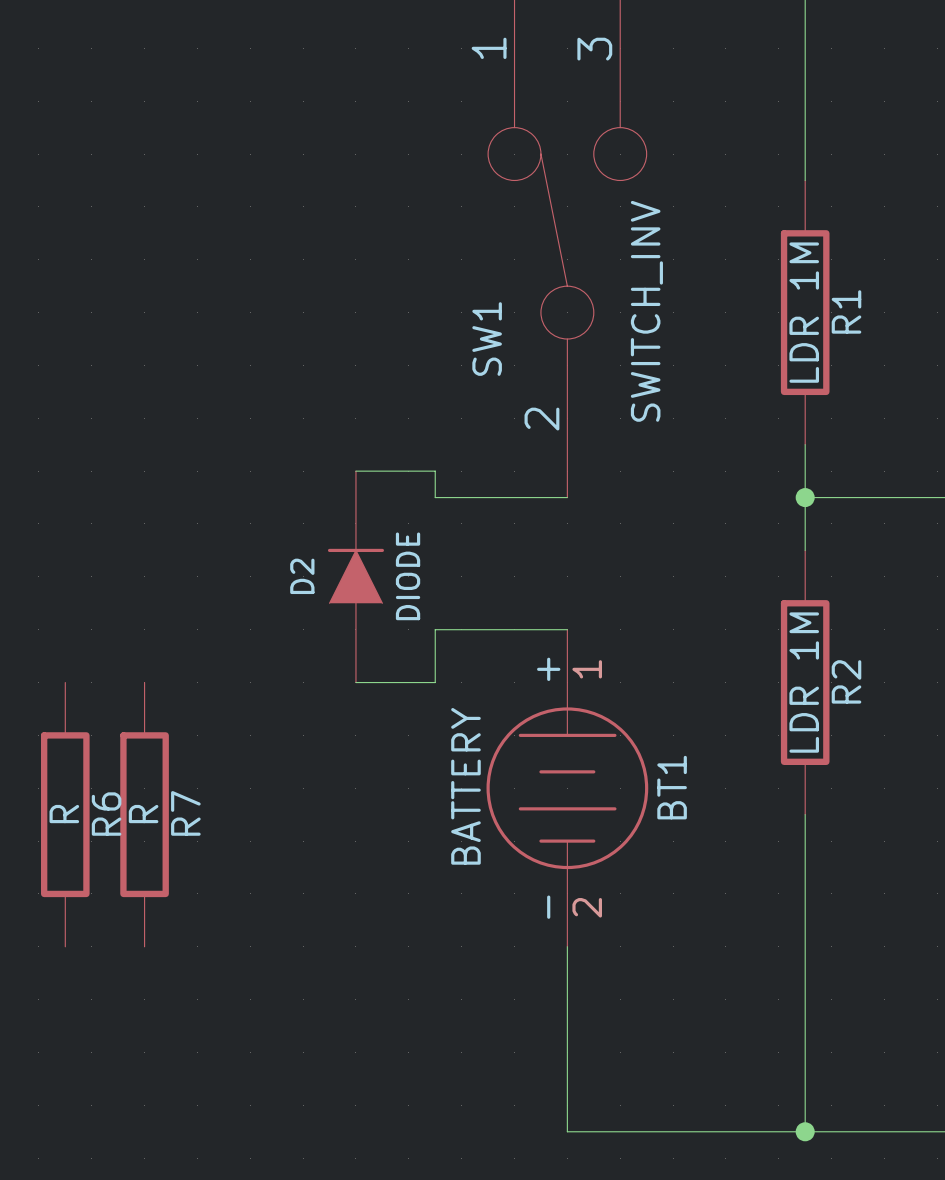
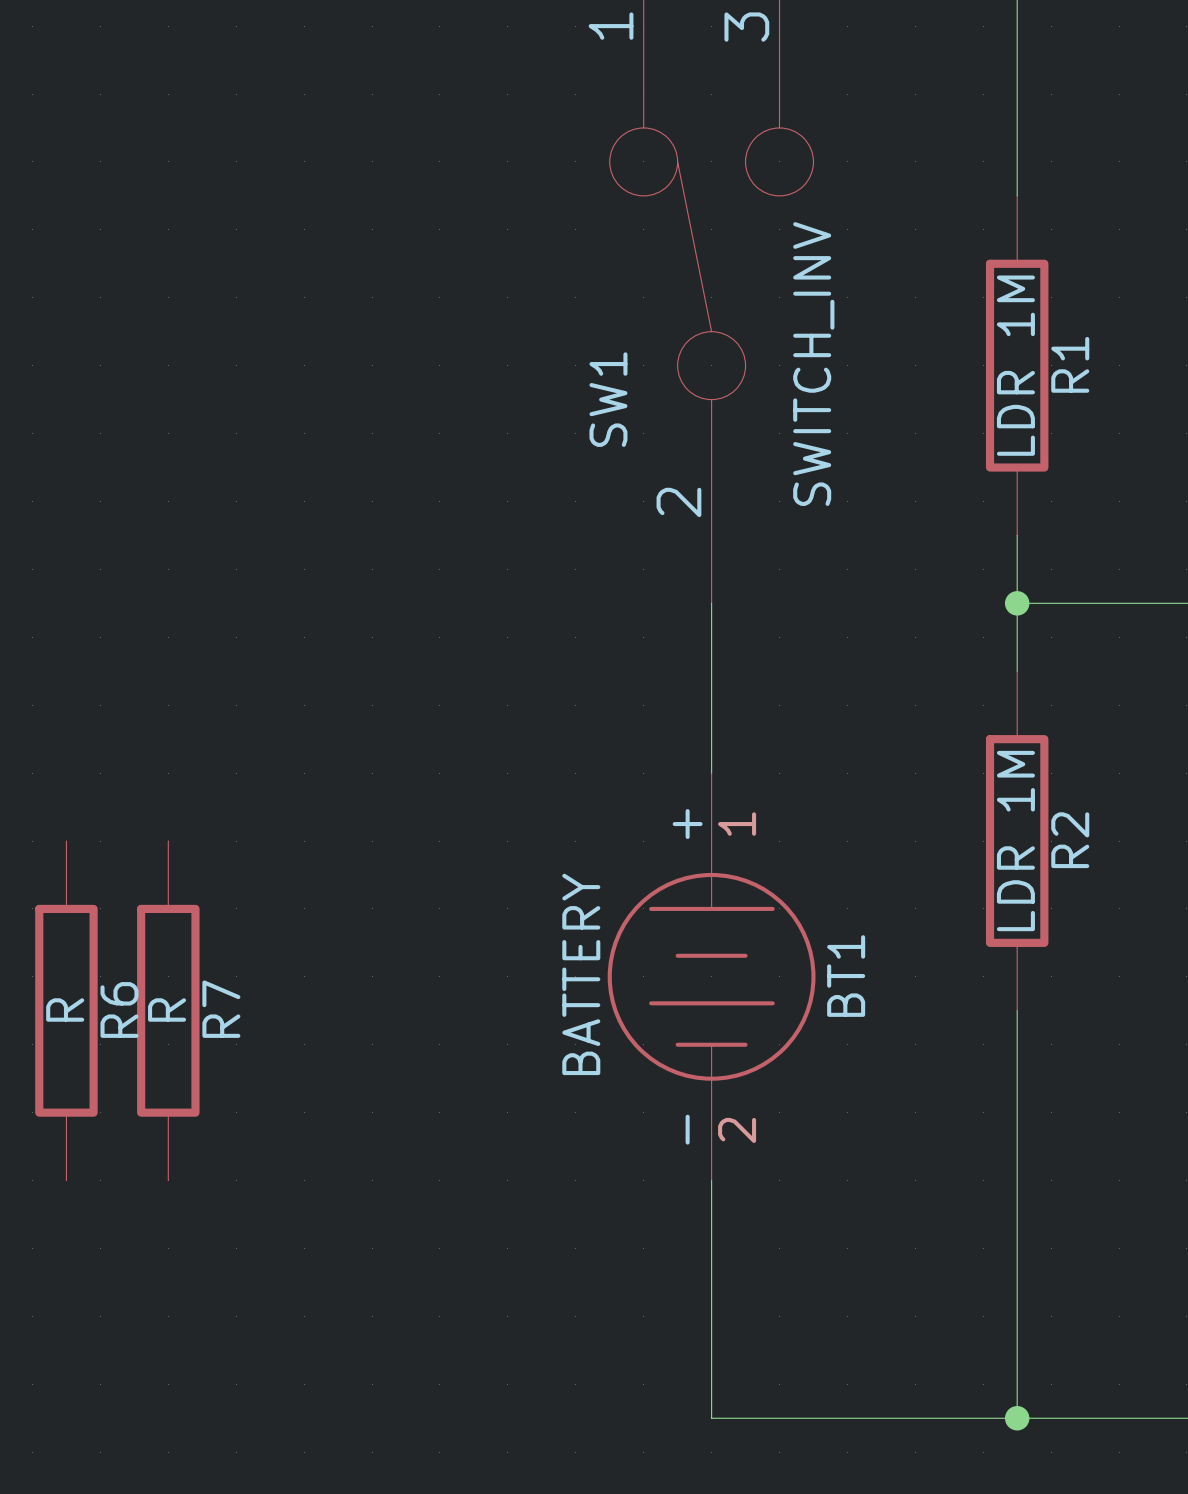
wire: (355, 471) (435, 471) (435, 497) (567, 497) -> (711, 773) (711, 603)
D2: DIODE (355, 576) -> none
wire: (567, 629) (435, 629) (435, 682) (355, 682) -> none

